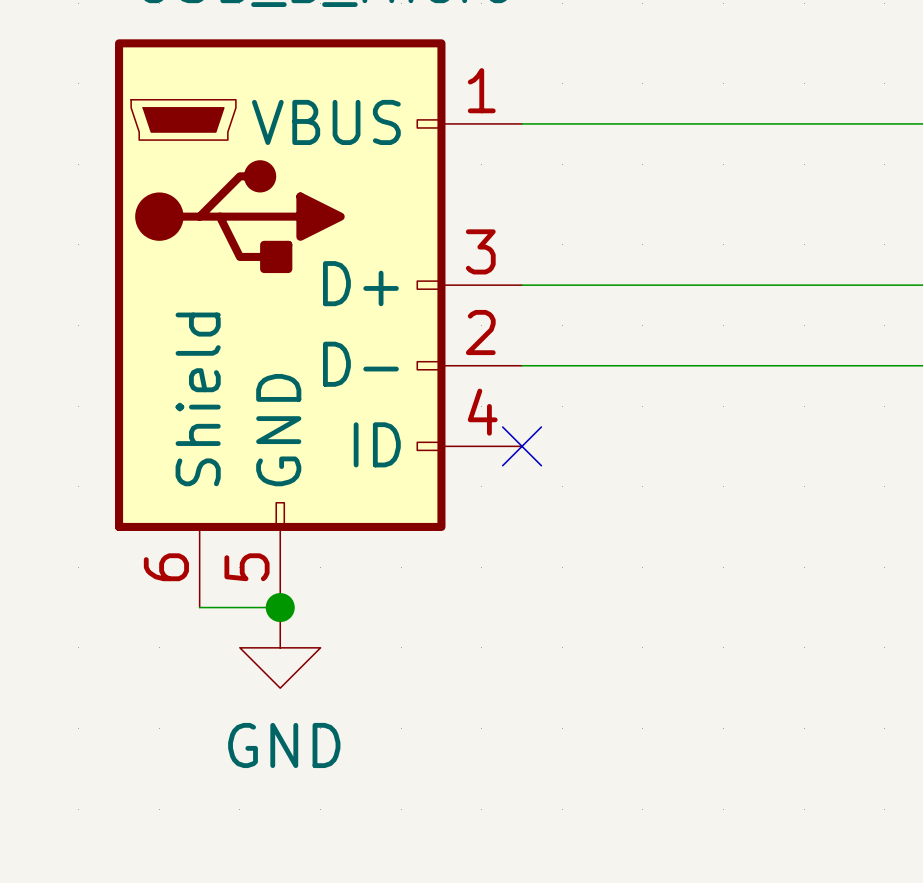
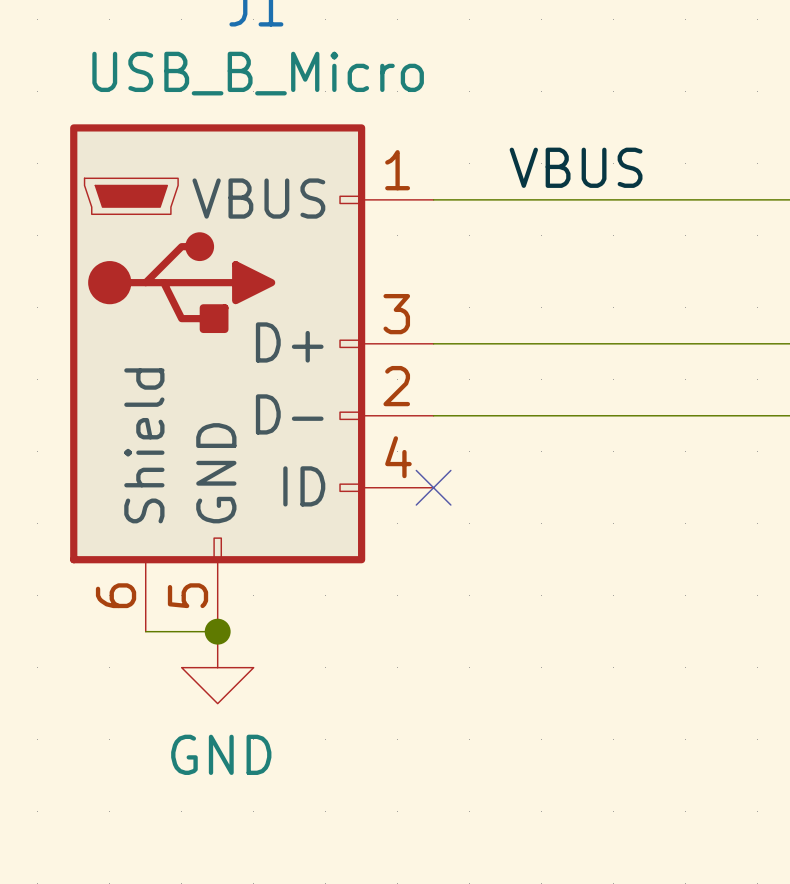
label: none -> VBUS (576, 167)

